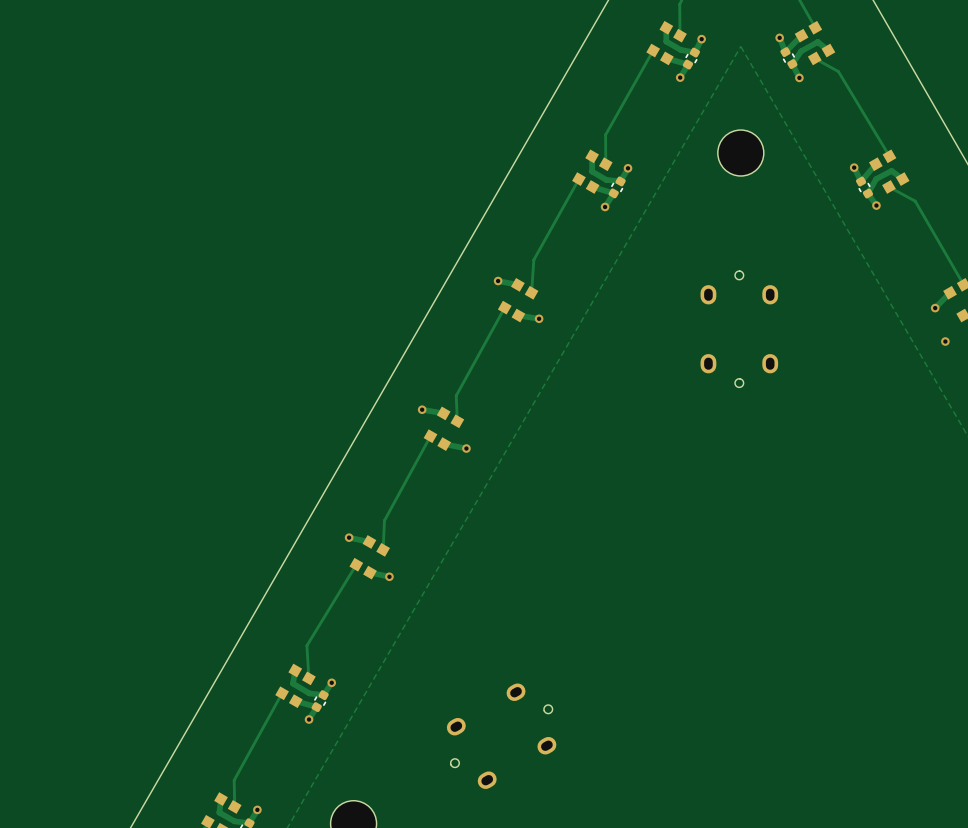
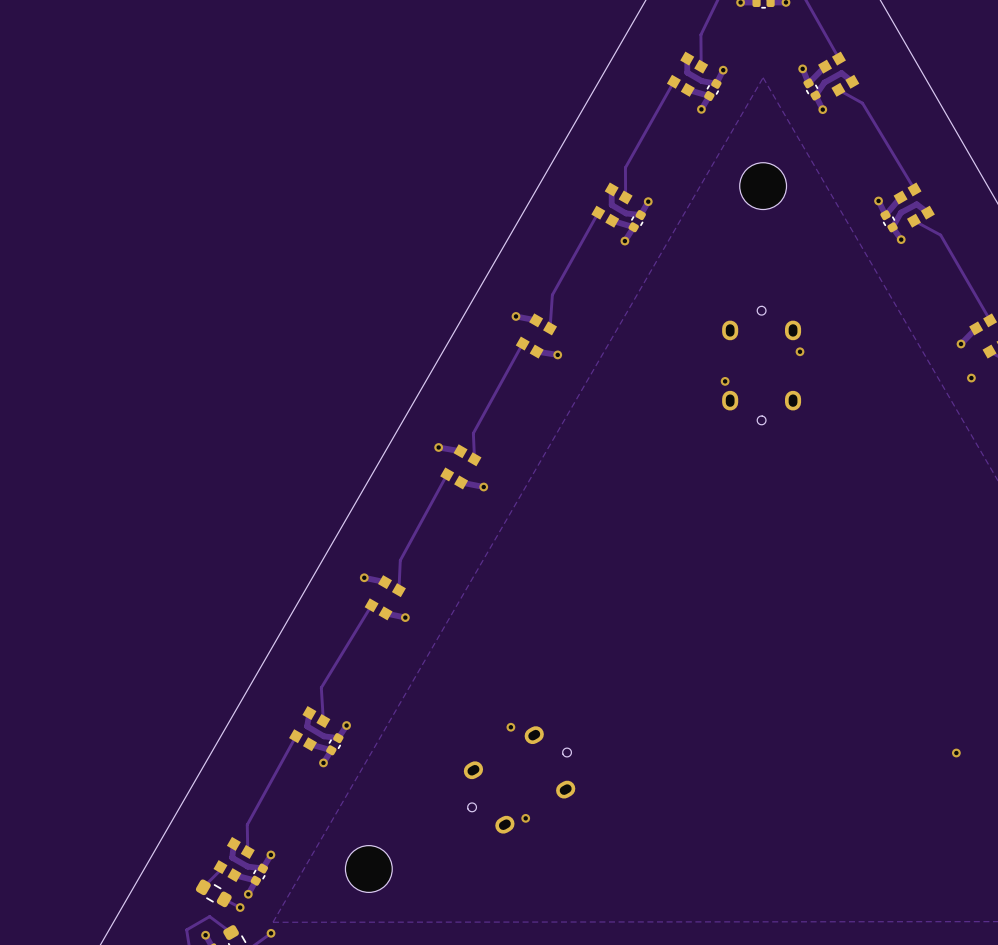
via: none -> (800, 351)
via: none -> (725, 381)
via: none -> (510, 727)
via: none -> (956, 753)
via: none -> (525, 818)

